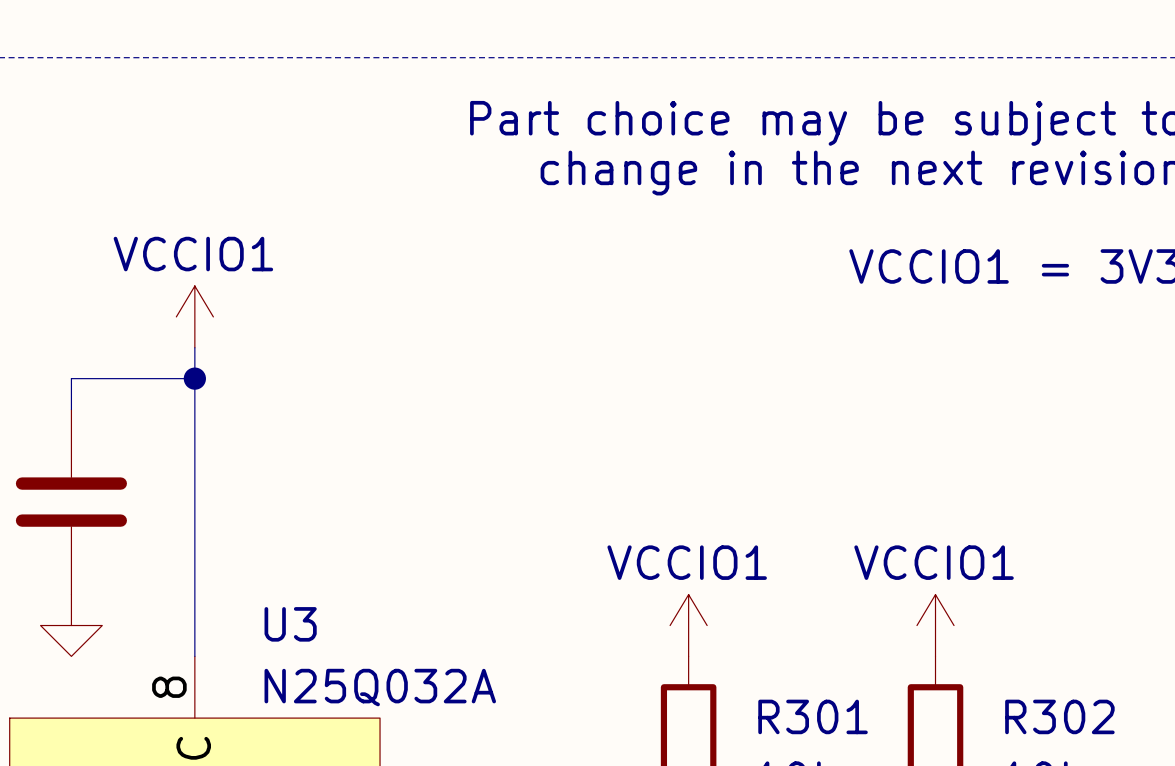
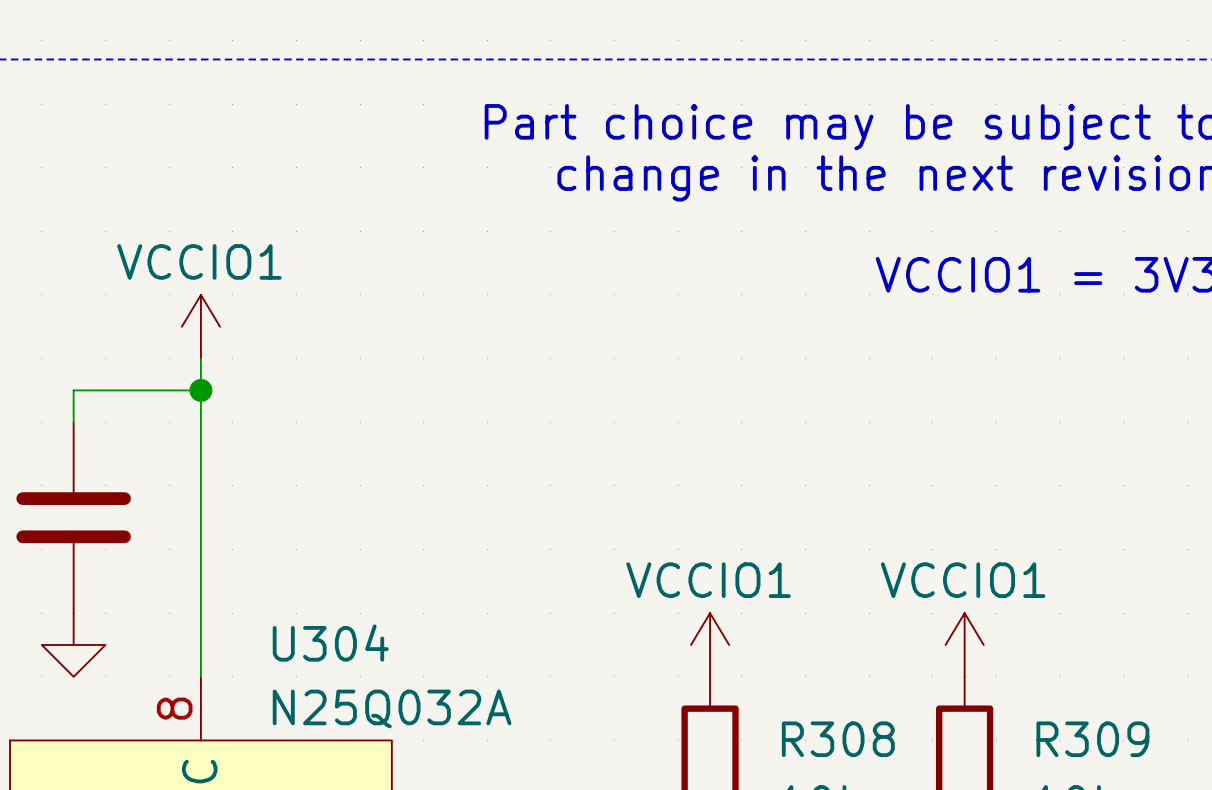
U3 name: U3 (290, 624) -> U304 (330, 643)
R301 name: R301 (813, 716) -> R308 (838, 739)
R302 name: R302 (1059, 716) -> R309 (1092, 739)

